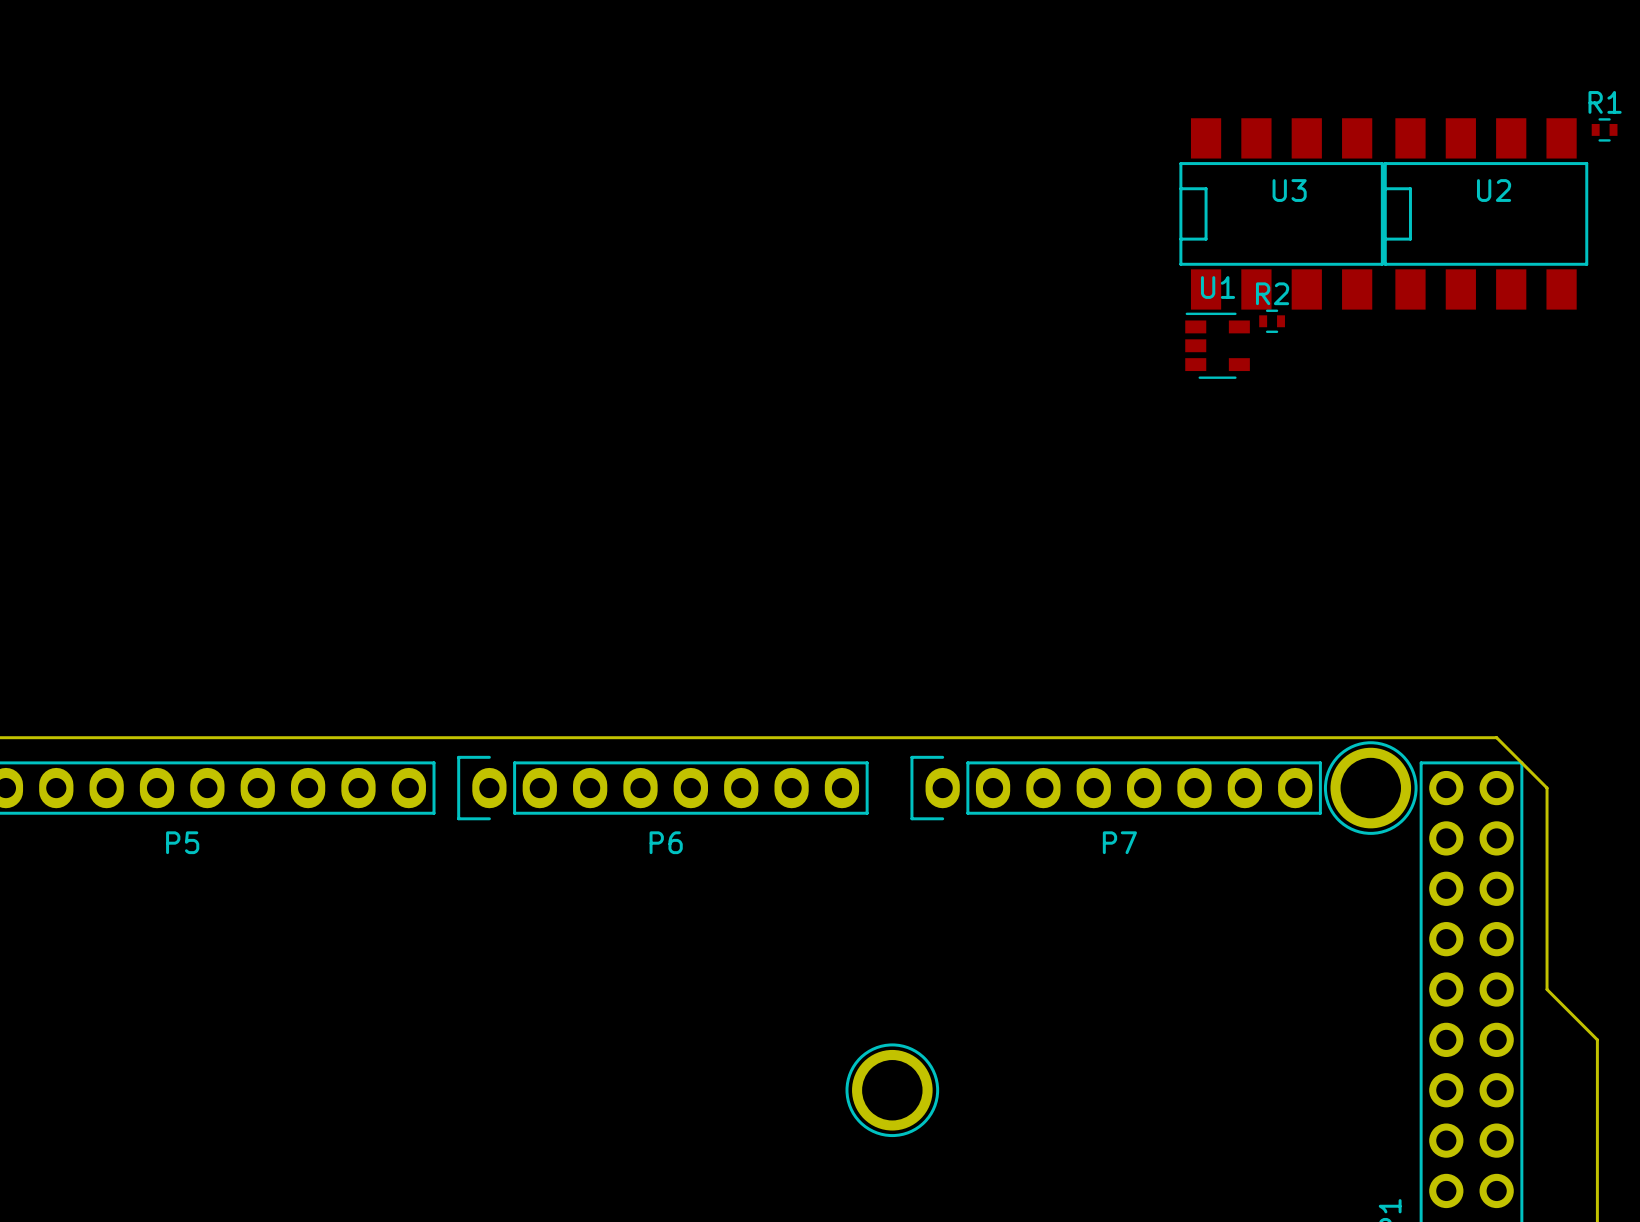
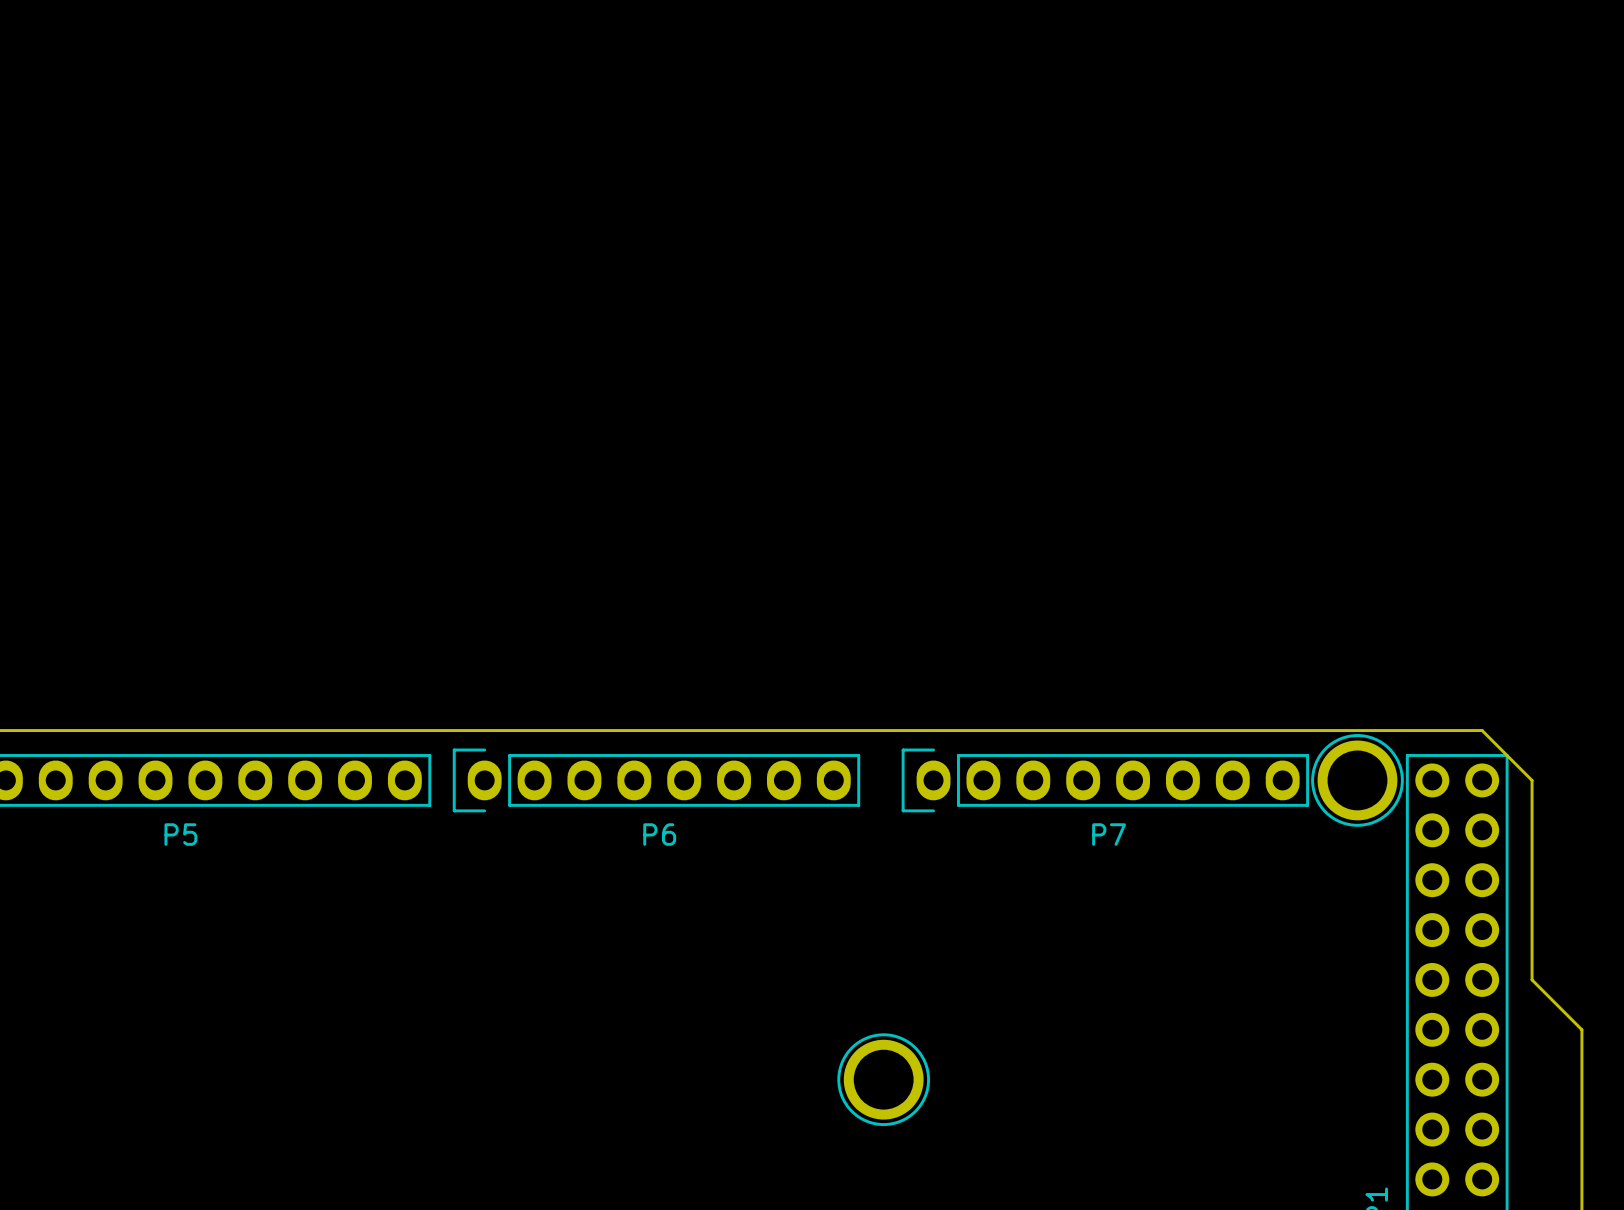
R1: (1604, 129) -> none
U3: (1281, 213) -> none
U2: (1486, 213) -> none
R2: (1272, 321) -> none
U1: (1217, 345) -> none

